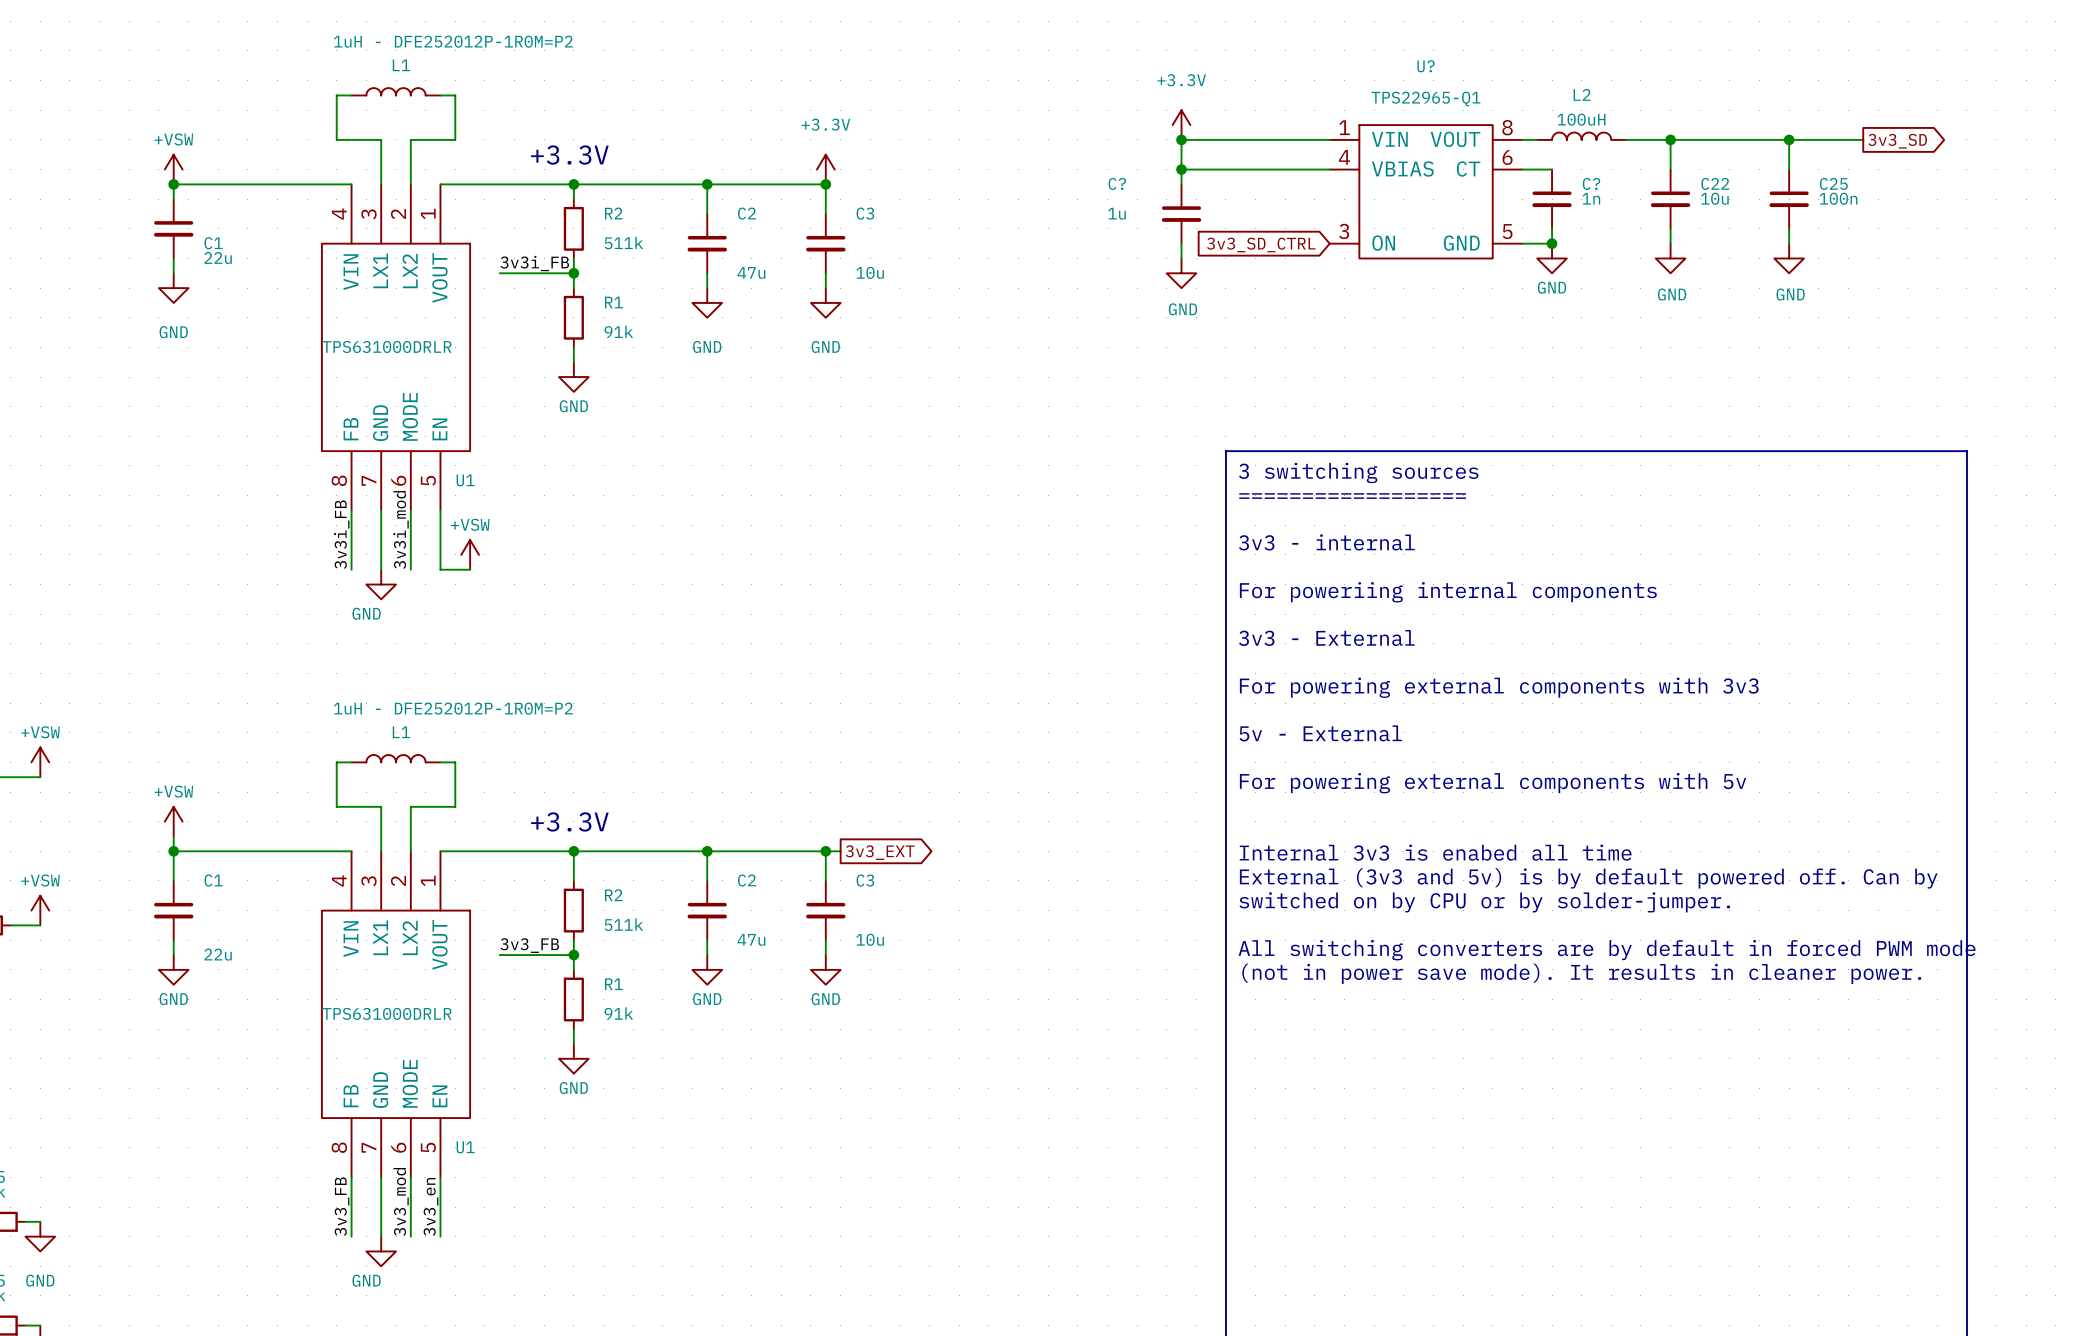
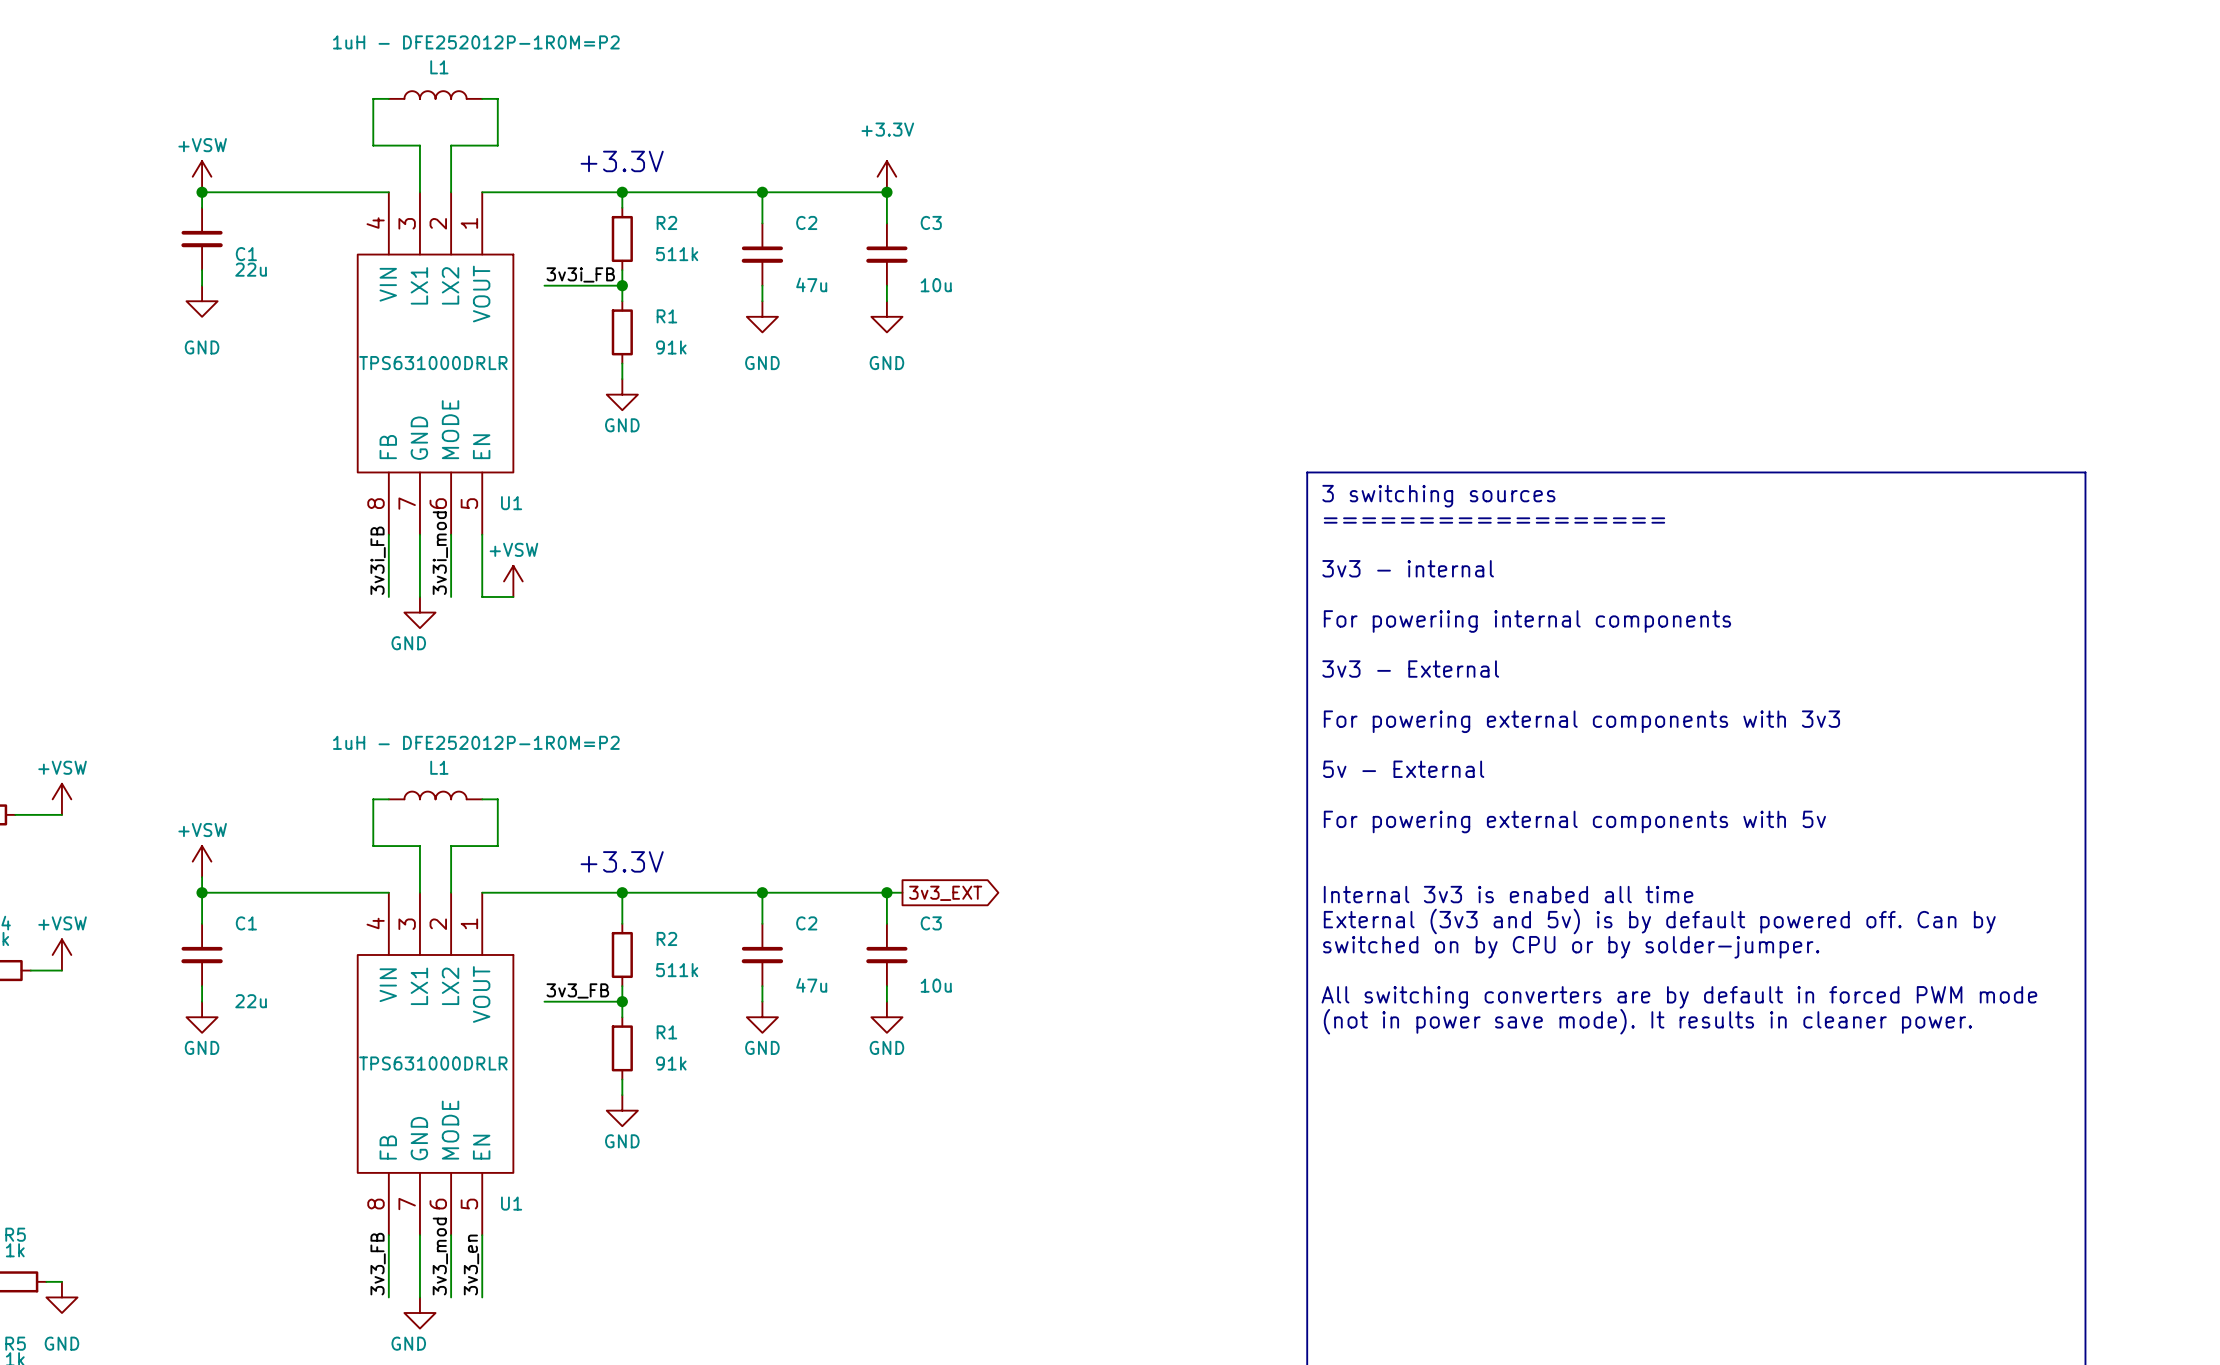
power symbol: +3.3V (1181, 125) -> none
L2: 100uH (1581, 136) -> none
junction: (1181, 139) -> none
wire: (1329, 139) (1181, 139) (1181, 184) -> none
wire: (1522, 139) (1537, 139) -> none
wire: (1626, 139) (1863, 139) -> none
wire: (1670, 139) (1670, 169) -> none
junction: (1670, 139) -> none
wire: (1789, 139) (1789, 169) -> none
junction: (1789, 139) -> none
global label: 3v3_SD (1897, 141) -> none
wire: (1181, 169) (1329, 169) -> none
junction: (1181, 169) -> none
wire: (1522, 169) (1552, 169) -> none
U?: TPS22965-Q1 (1426, 191) -> none
C?: 1n (1552, 199) -> none
C22: 10u (1670, 199) -> none
C25: 100n (1789, 199) -> none
C?: 1u (1181, 214) -> none
wire: (1552, 228) (1552, 243) (1522, 243) -> none
wire: (1670, 228) (1670, 243) -> none
wire: (1789, 228) (1789, 243) -> none
wire: (1181, 243) (1181, 258) -> none
junction: (1552, 243) -> none
global label: 3v3_SD_CTRL (1261, 244) -> none
power symbol: GND (1552, 258) -> none
power symbol: GND (1670, 258) -> none
power symbol: GND (1789, 258) -> none
power symbol: GND (1181, 273) -> none

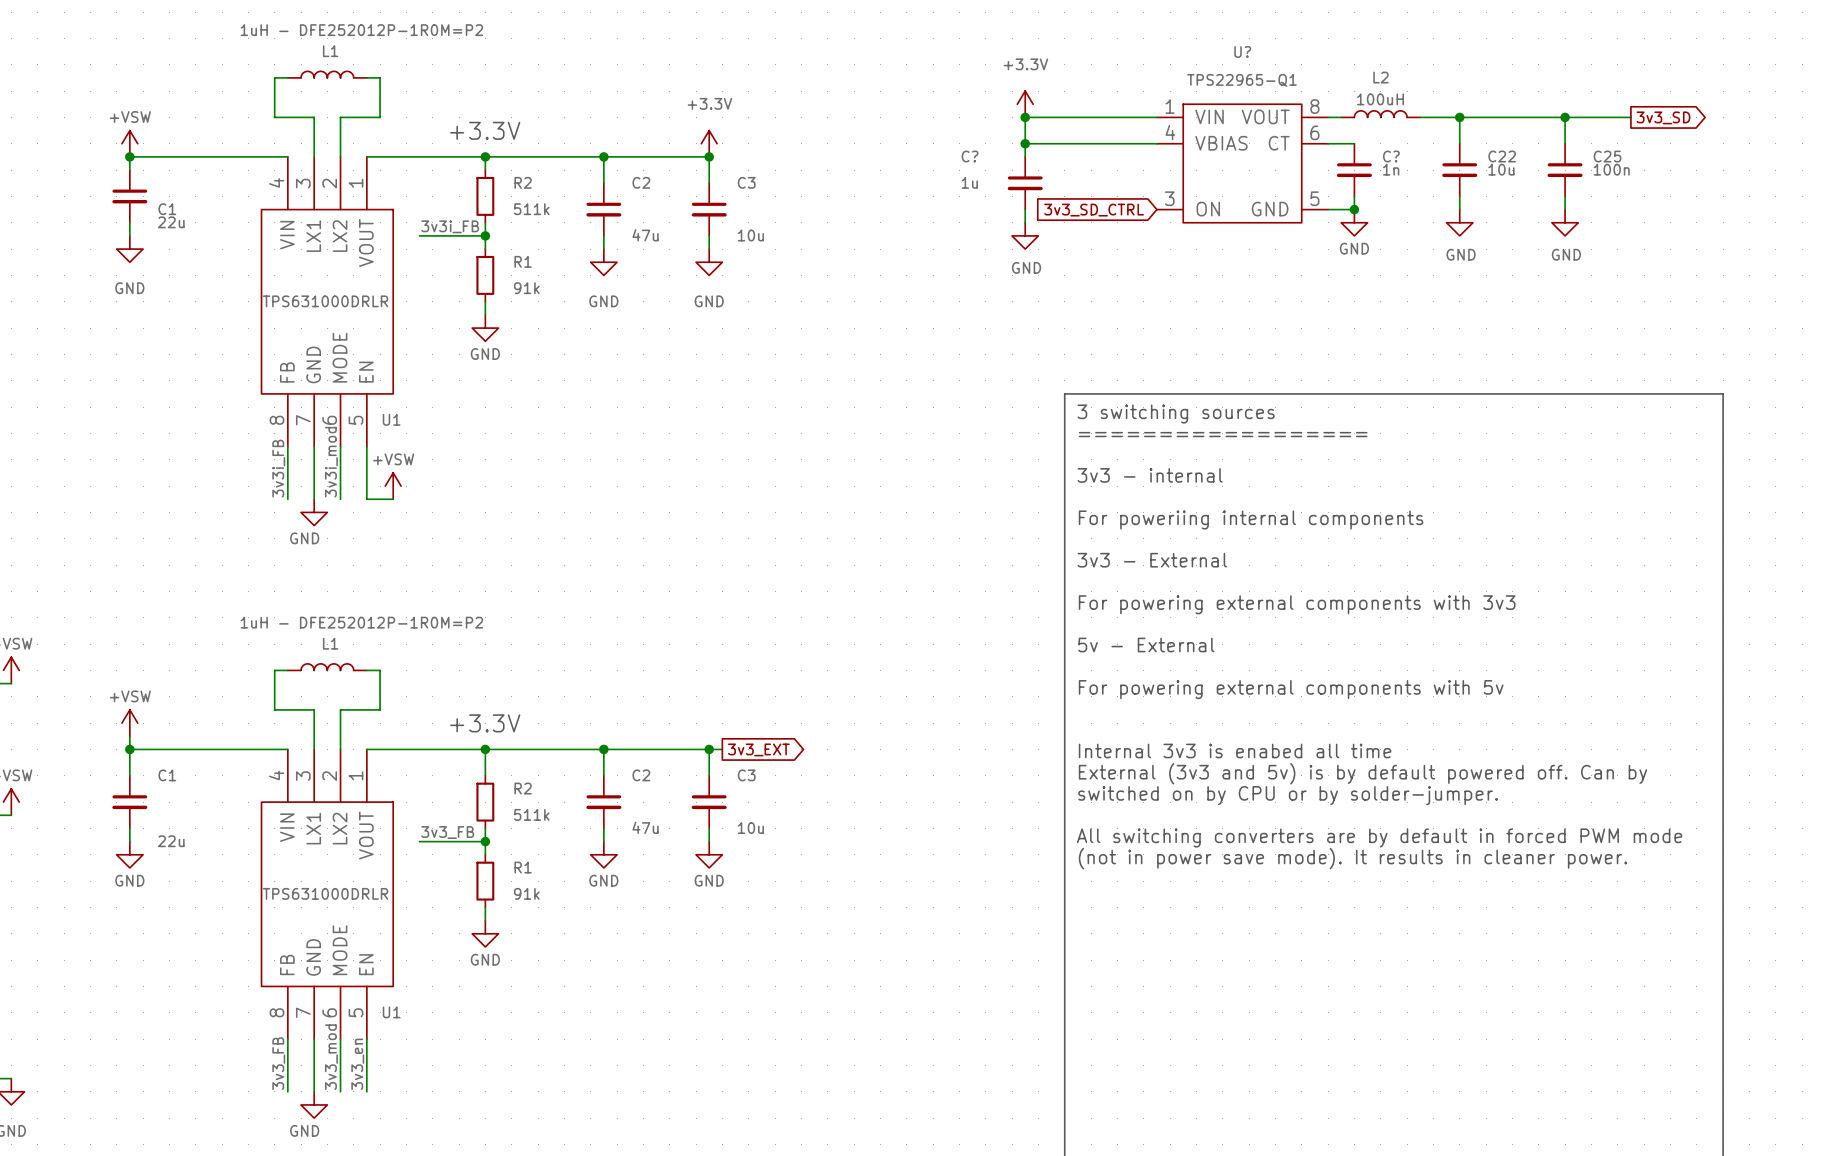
power symbol: none -> +3.3V (1025, 104)
L2: none -> 100uH (1380, 114)
junction: none -> (1025, 117)
wire: none -> (1156, 117) (1025, 117) (1025, 156)
wire: none -> (1328, 117) (1341, 117)
wire: none -> (1420, 117) (1630, 117)
wire: none -> (1459, 117) (1459, 143)
junction: none -> (1459, 117)
wire: none -> (1565, 117) (1565, 143)
junction: none -> (1565, 117)
global label: none -> 3v3_SD (1663, 117)
wire: none -> (1025, 143) (1156, 143)
junction: none -> (1025, 143)
wire: none -> (1328, 143) (1354, 143)
U?: none -> TPS22965-Q1 (1242, 163)
C?: none -> 1n (1354, 170)
C22: none -> 10u (1459, 170)
C25: none -> 100n (1565, 170)
C?: none -> 1u (1025, 183)
wire: none -> (1354, 196) (1354, 209) (1328, 209)
wire: none -> (1459, 196) (1459, 209)
wire: none -> (1565, 196) (1565, 209)
wire: none -> (1025, 209) (1025, 222)
junction: none -> (1354, 209)
global label: none -> 3v3_SD_CTRL (1094, 210)
power symbol: none -> GND (1354, 222)
power symbol: none -> GND (1459, 222)
power symbol: none -> GND (1565, 222)
power symbol: none -> GND (1025, 235)

